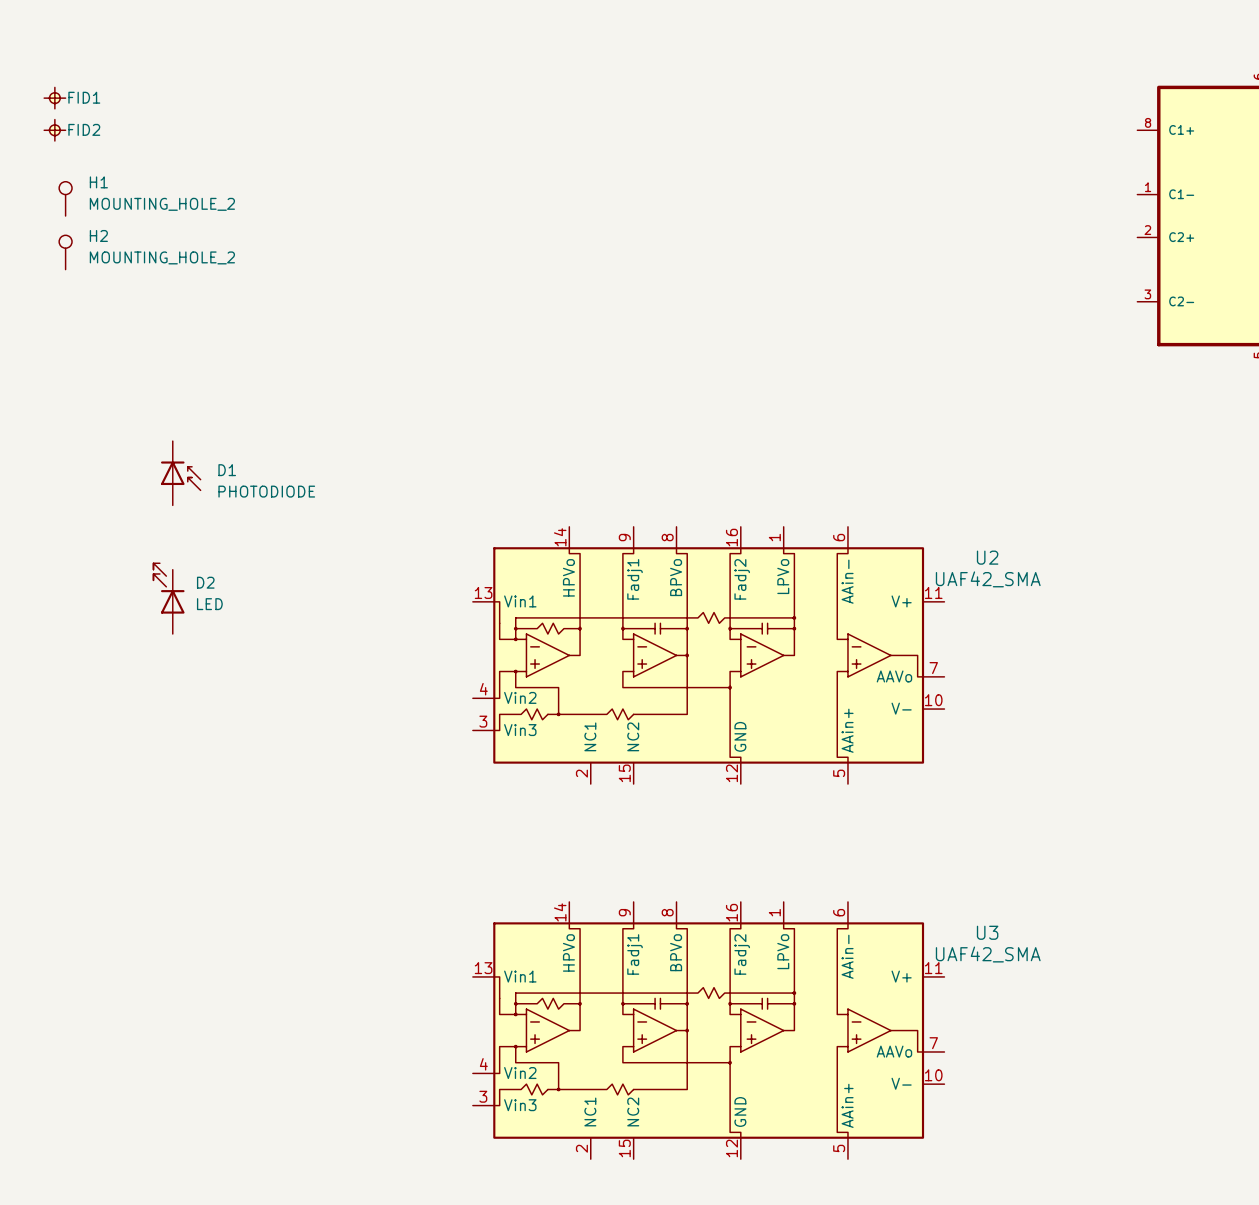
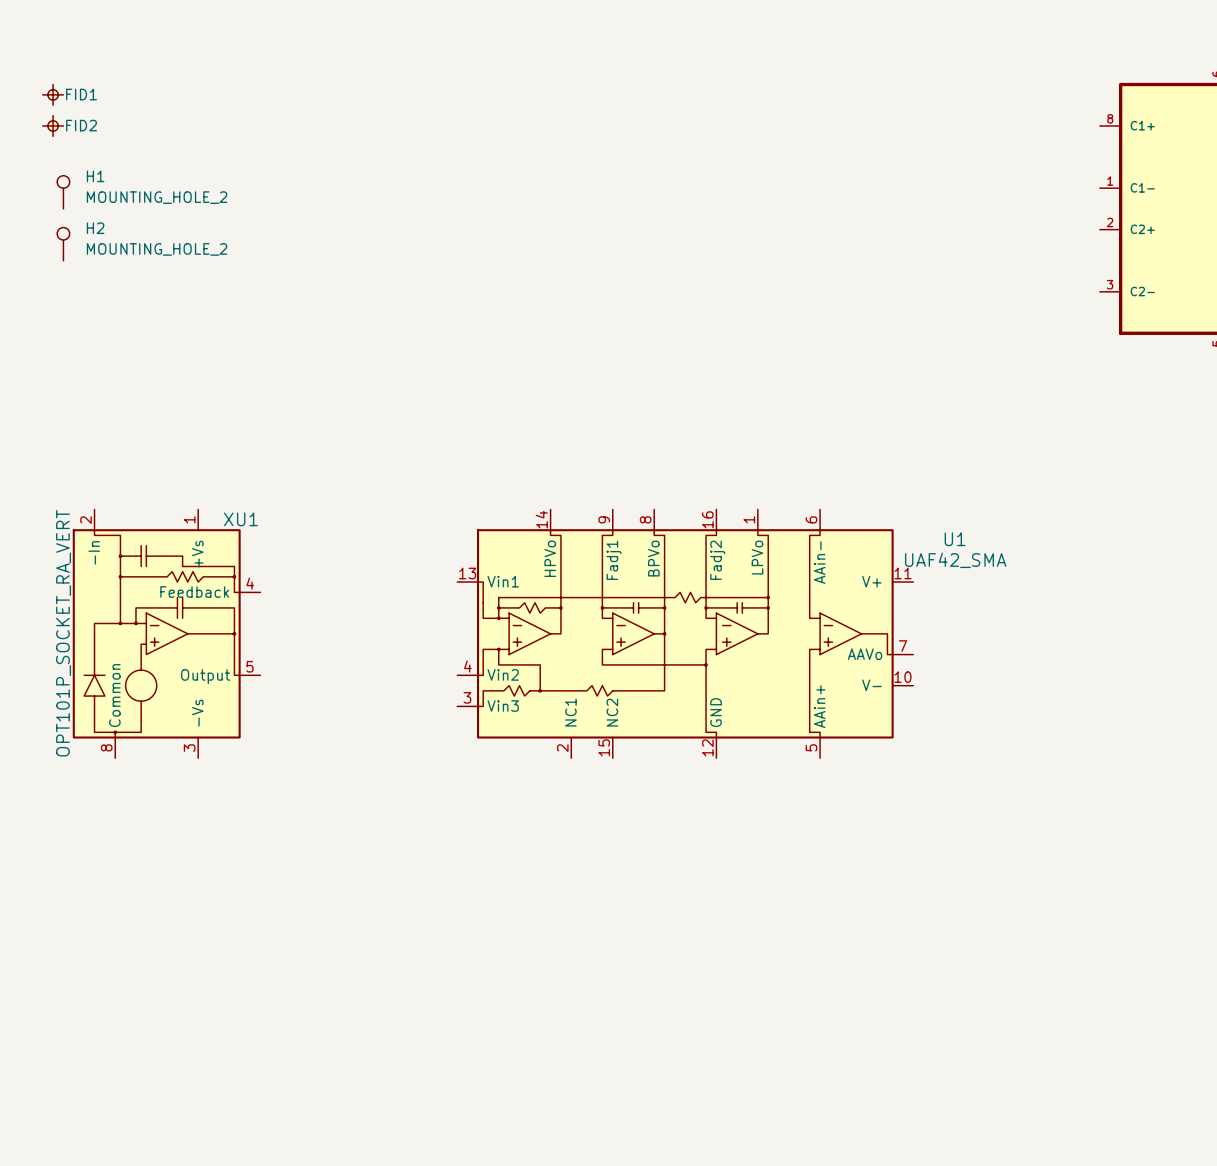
D1: PHOTODIODE (180, 473) -> none
U2 name: U2 (987, 557) -> U1 (955, 539)
D2: LED (169, 598) -> none
XU1: none -> OPT101P_SOCKET_RA_VERT (166, 633)
U3: UAF42_SMA (708, 1030) -> none

